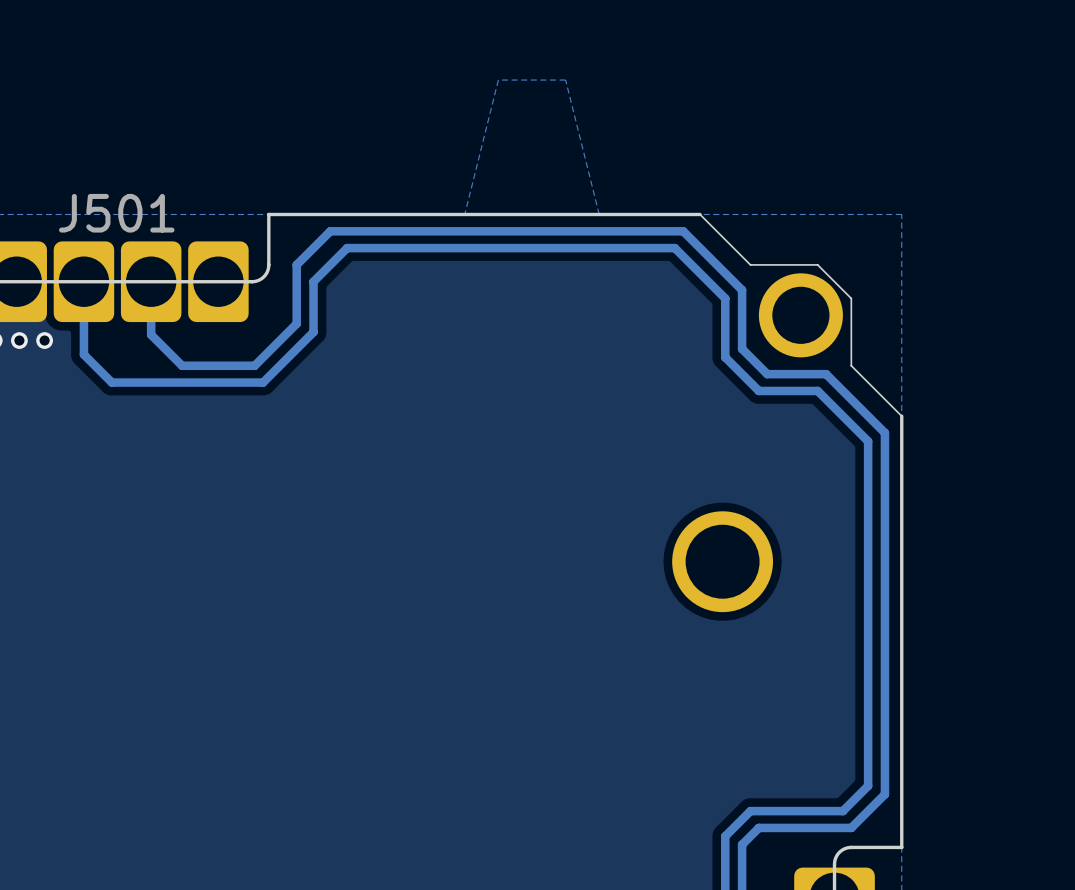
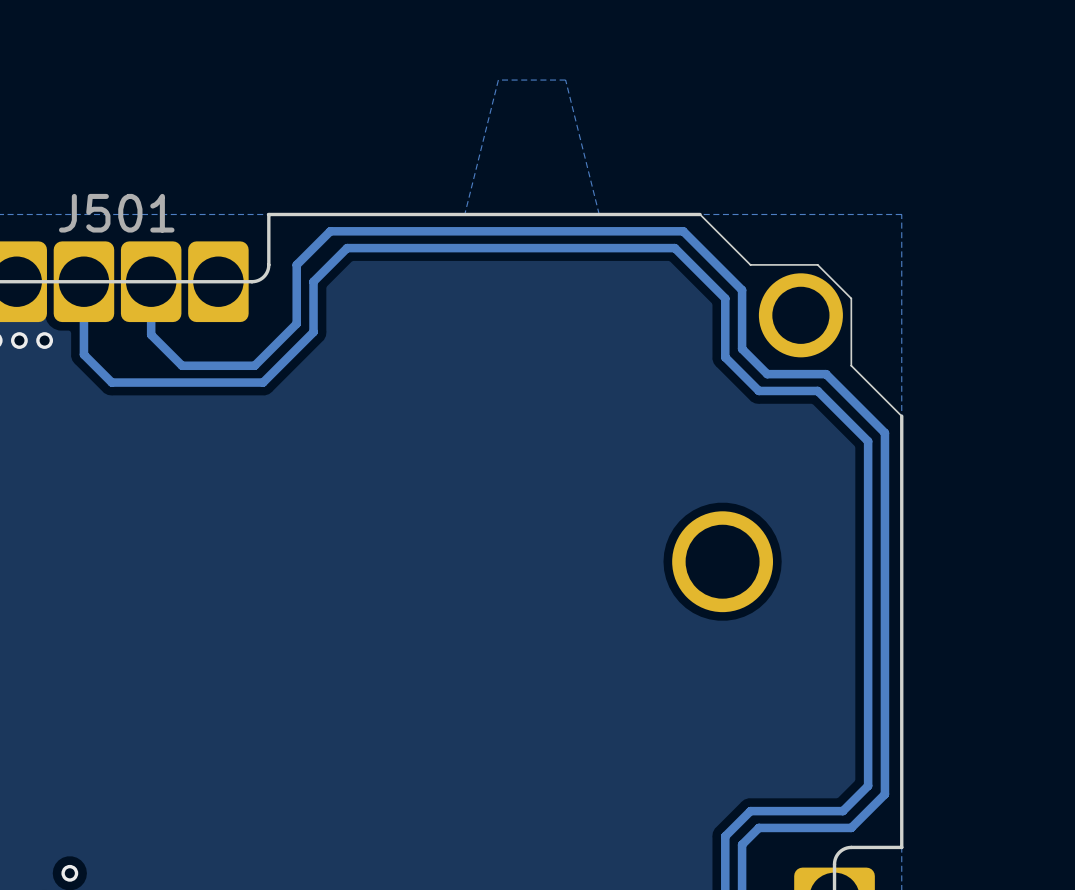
via: none -> (69, 873)

